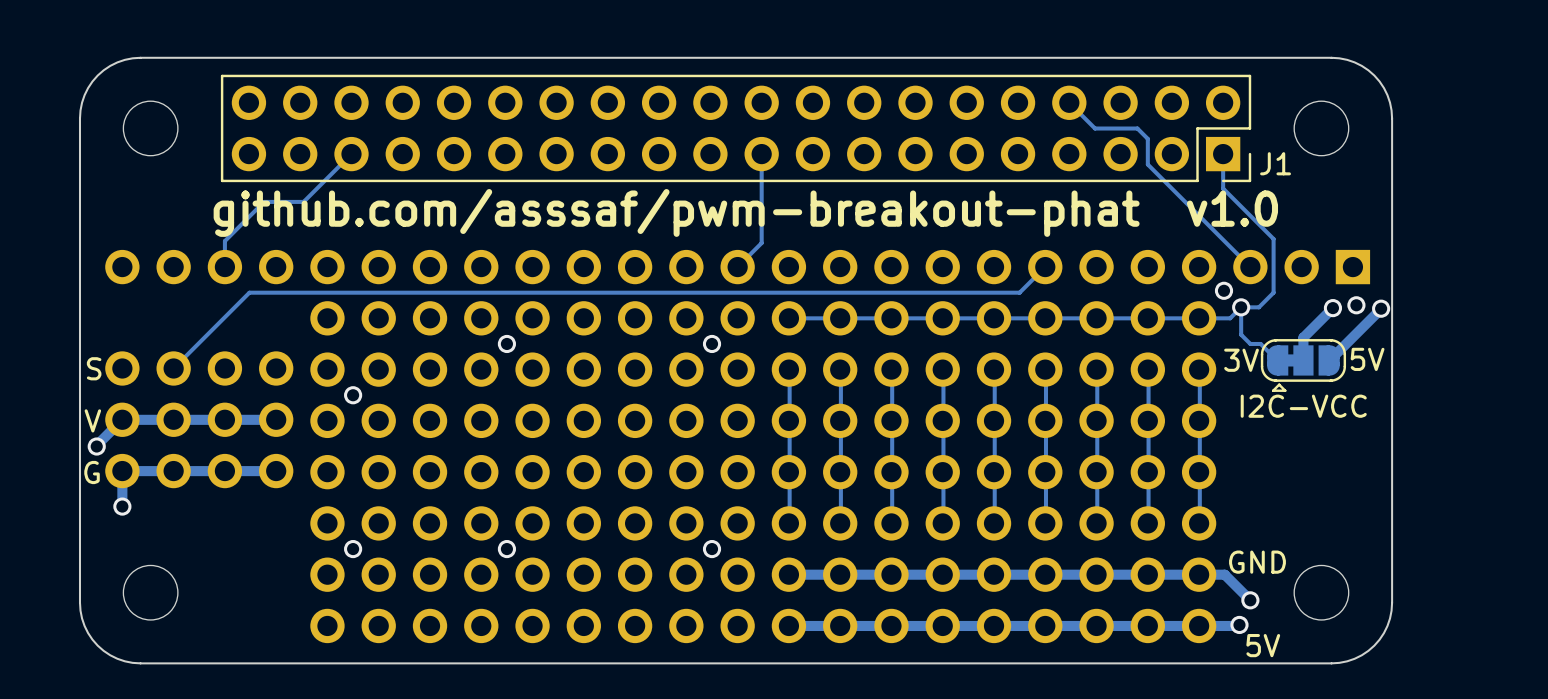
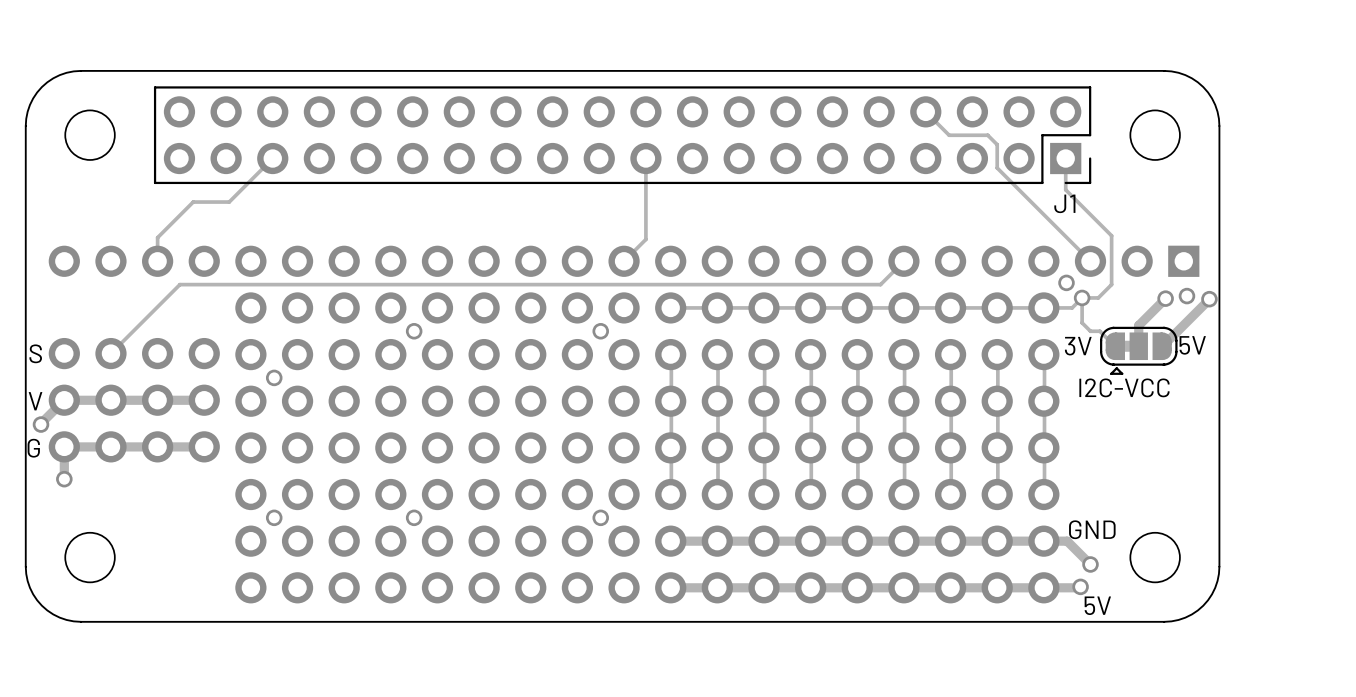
J1 name position: J1 (1275, 163) -> J1 (1064, 203)
text: github.com/asssaf/pwm-breakout-phat v1.0 (745, 212) -> none

